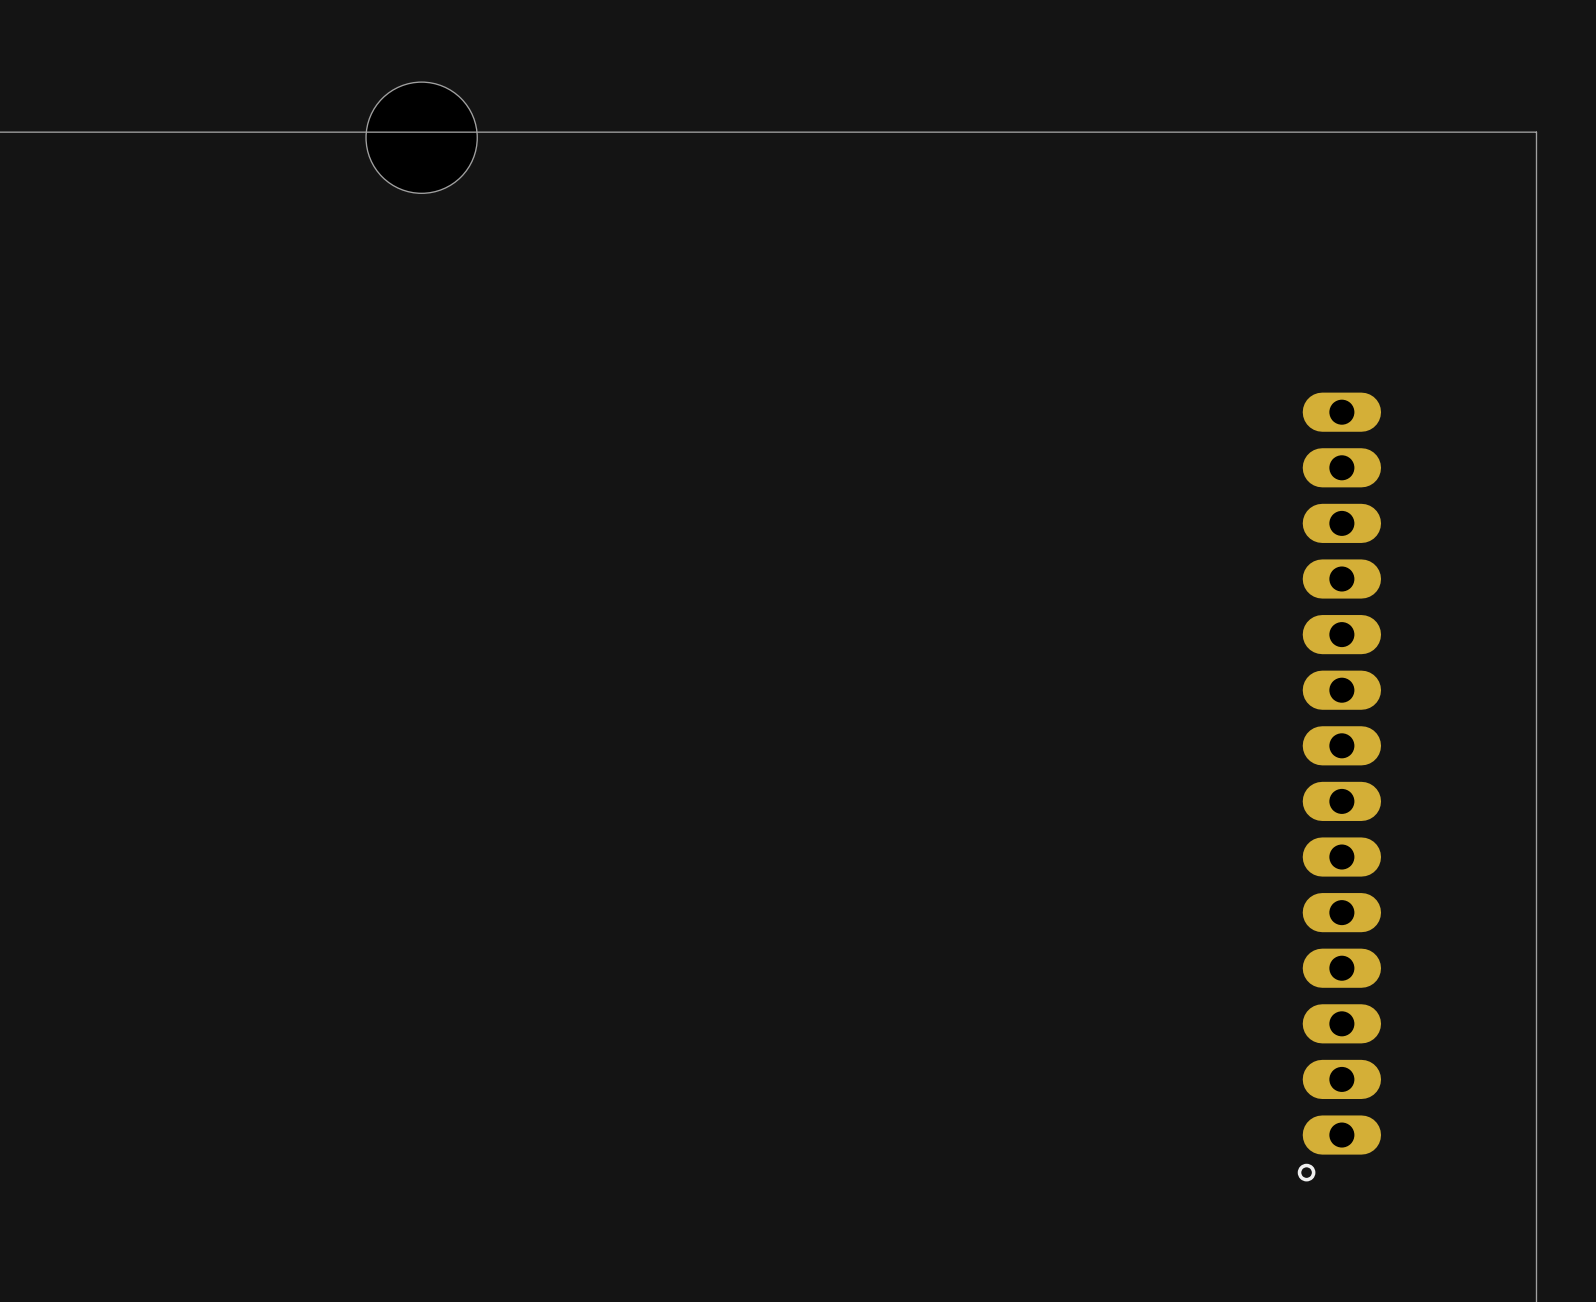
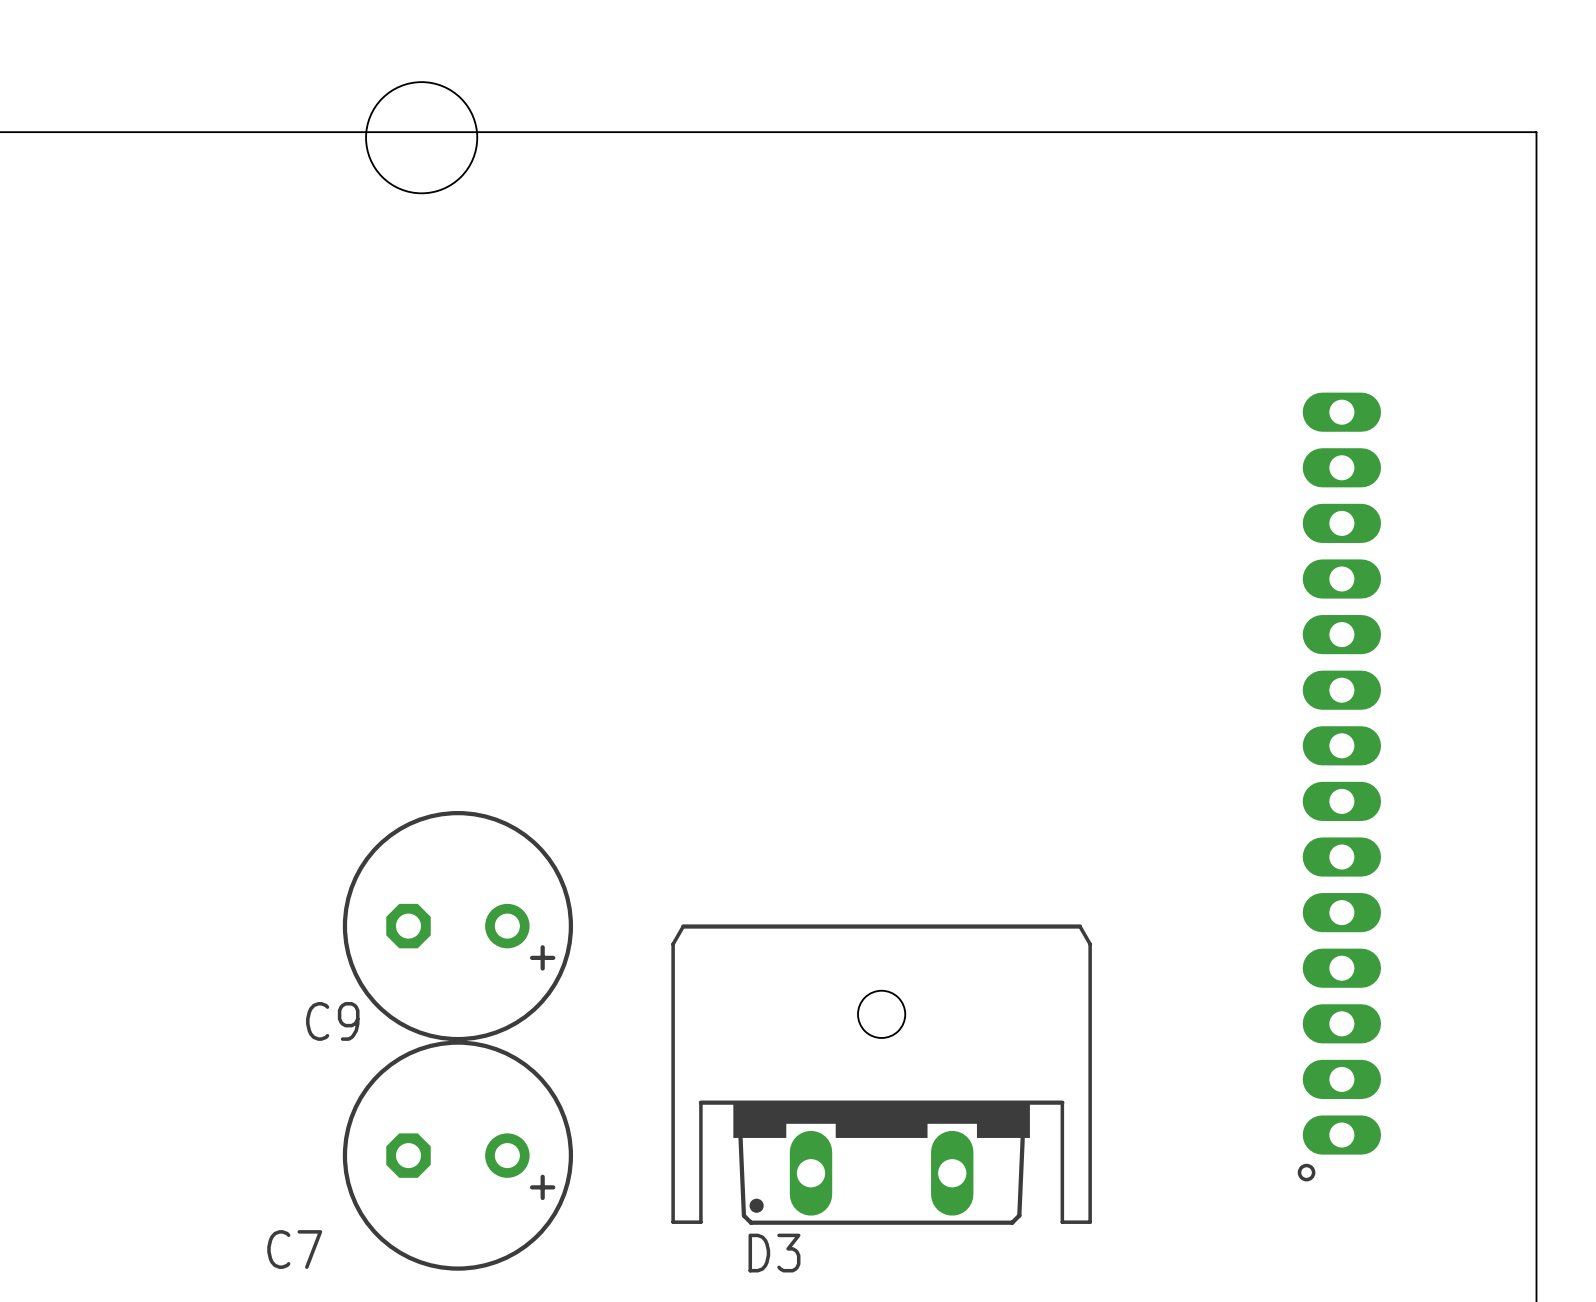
C9: none -> (457, 926)
part: none -> (881, 1074)
C7: none -> (457, 1155)
D3: none -> (881, 1163)

